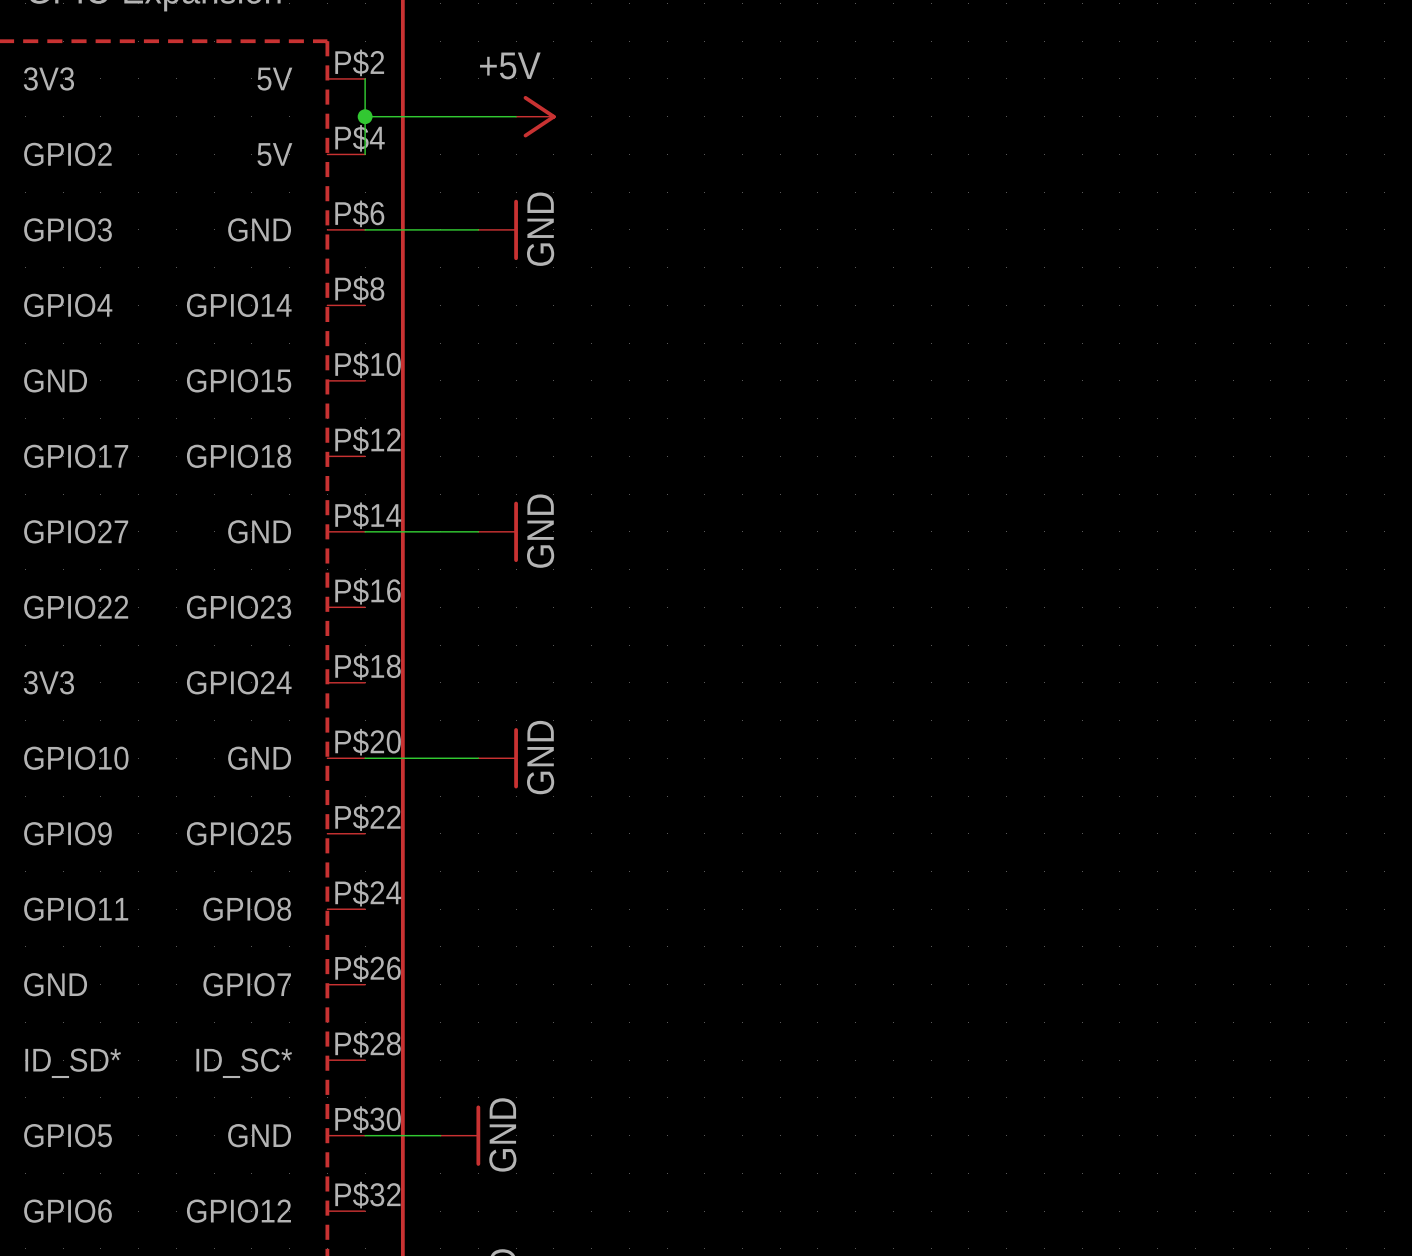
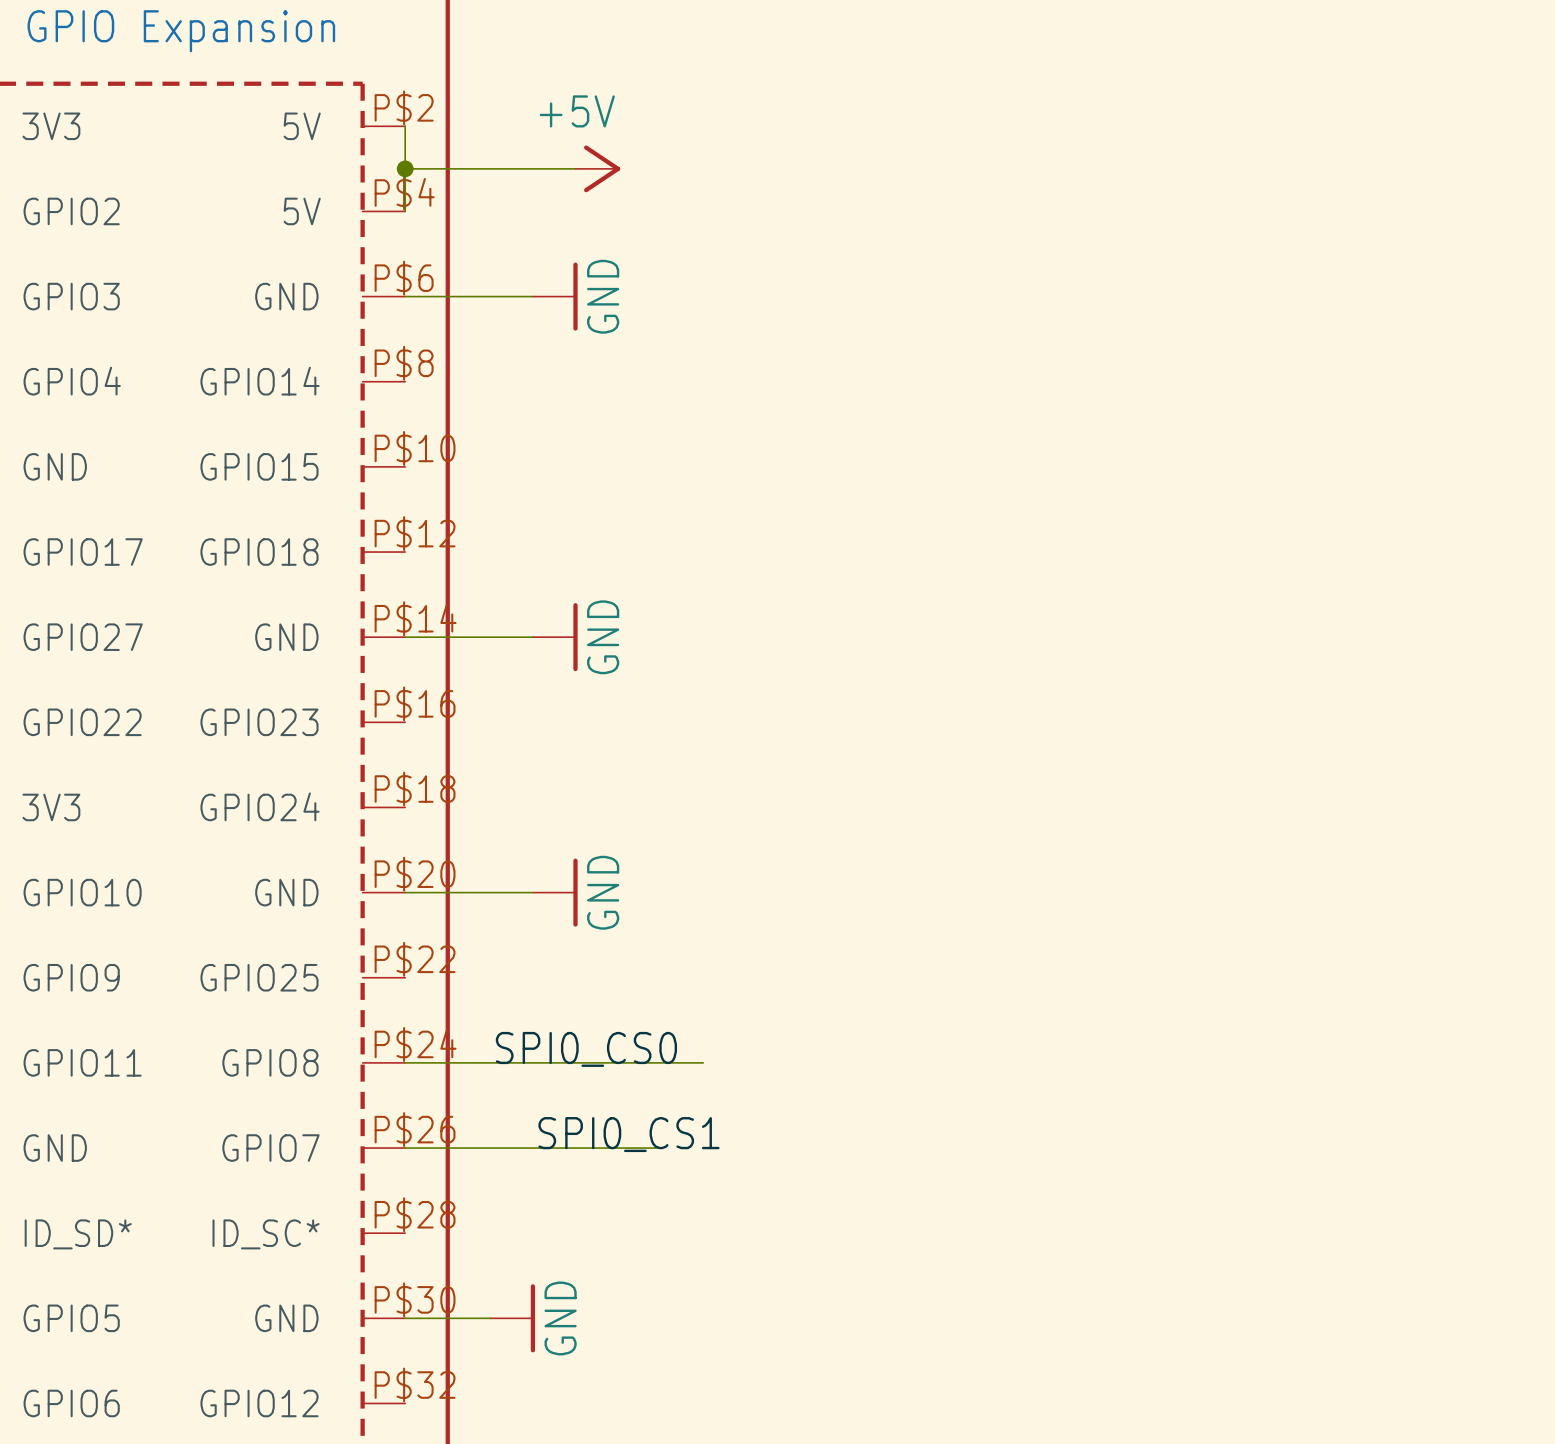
label: none -> SPI0_CS0 (586, 1049)
wire: none -> (405, 1062) (703, 1062)
label: none -> SPI0_CS1 (628, 1134)
wire: none -> (405, 1148) (660, 1148)

